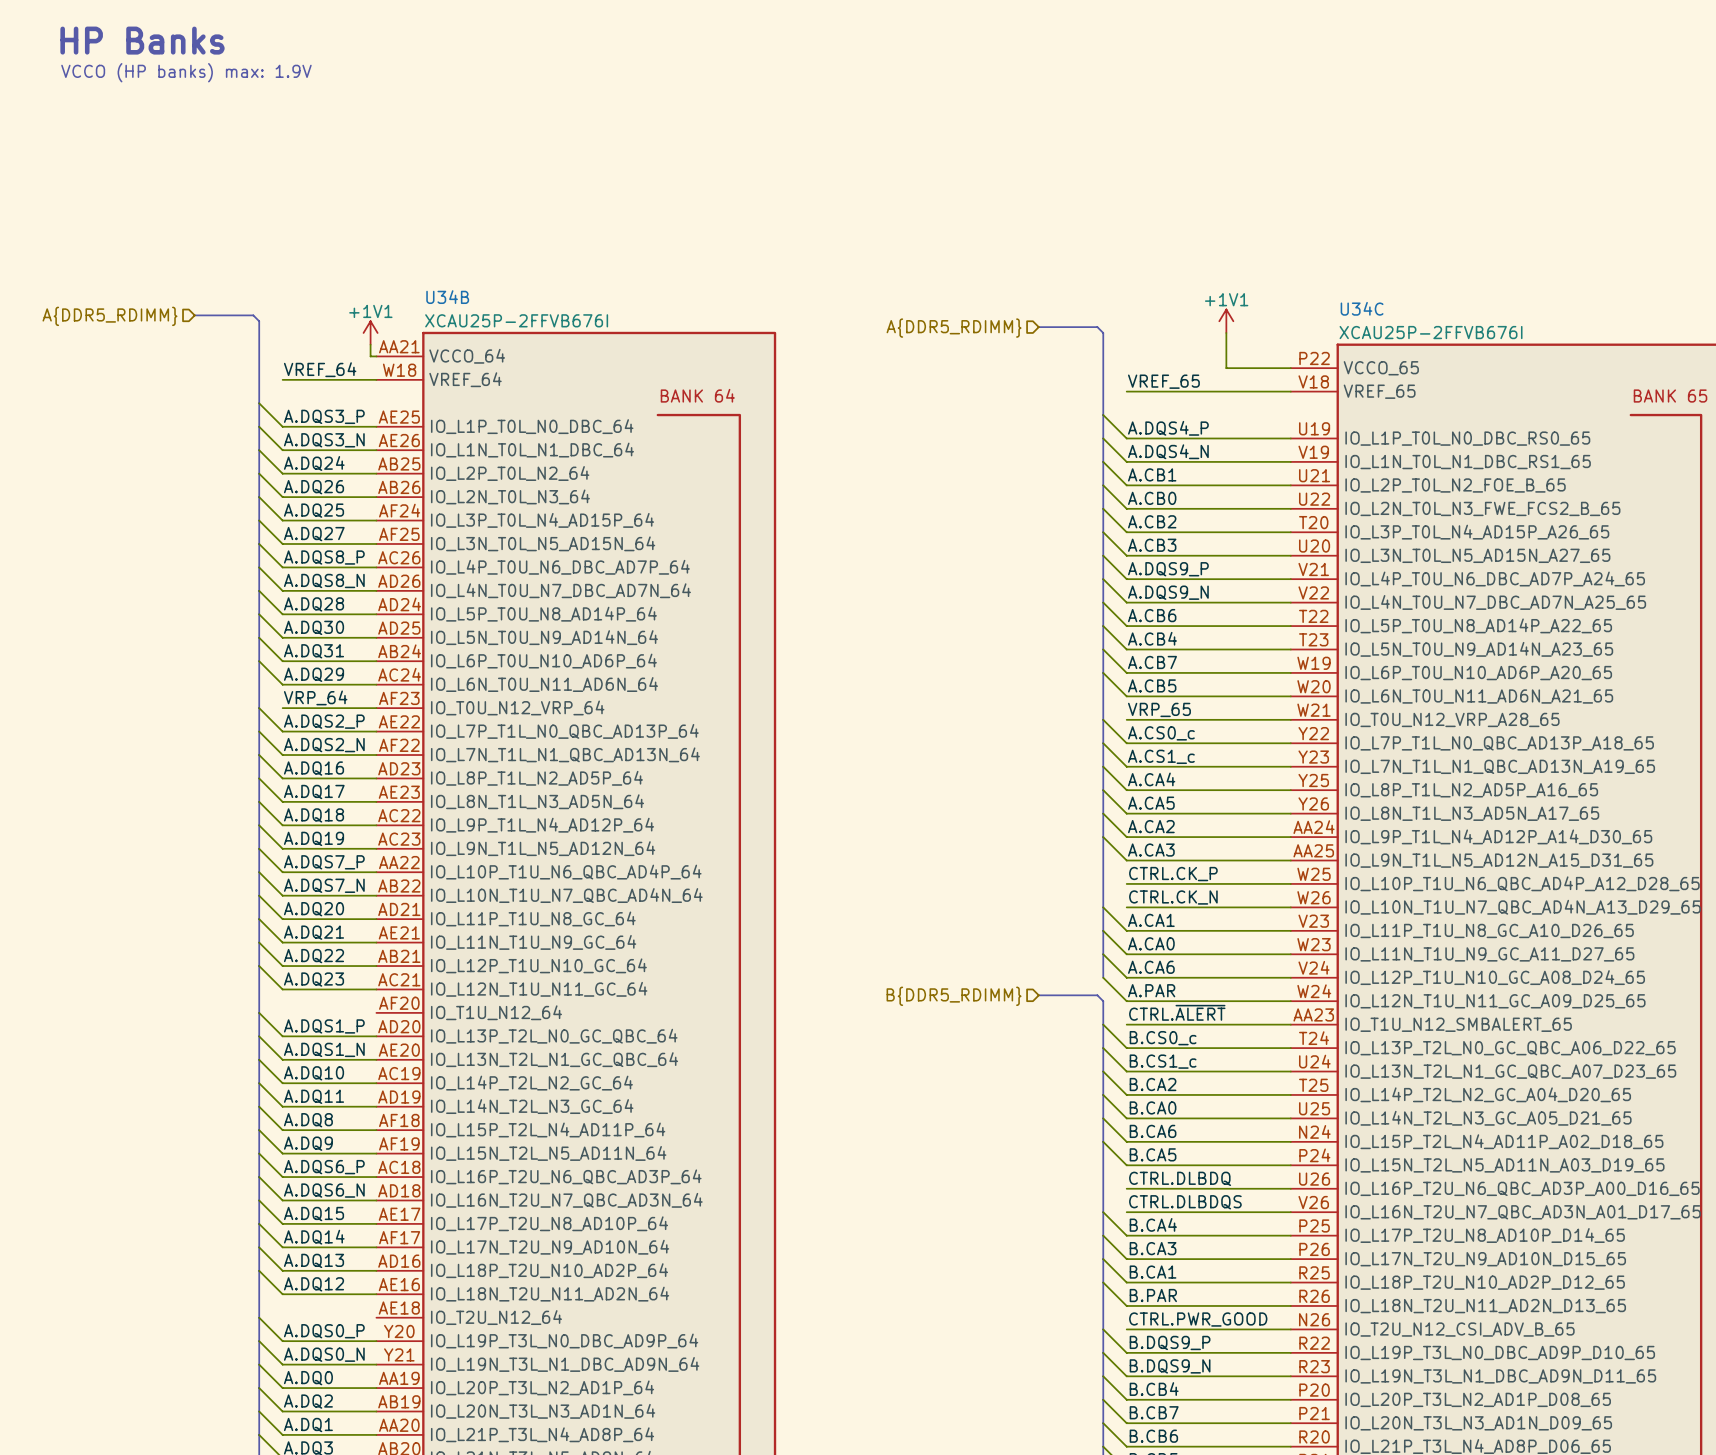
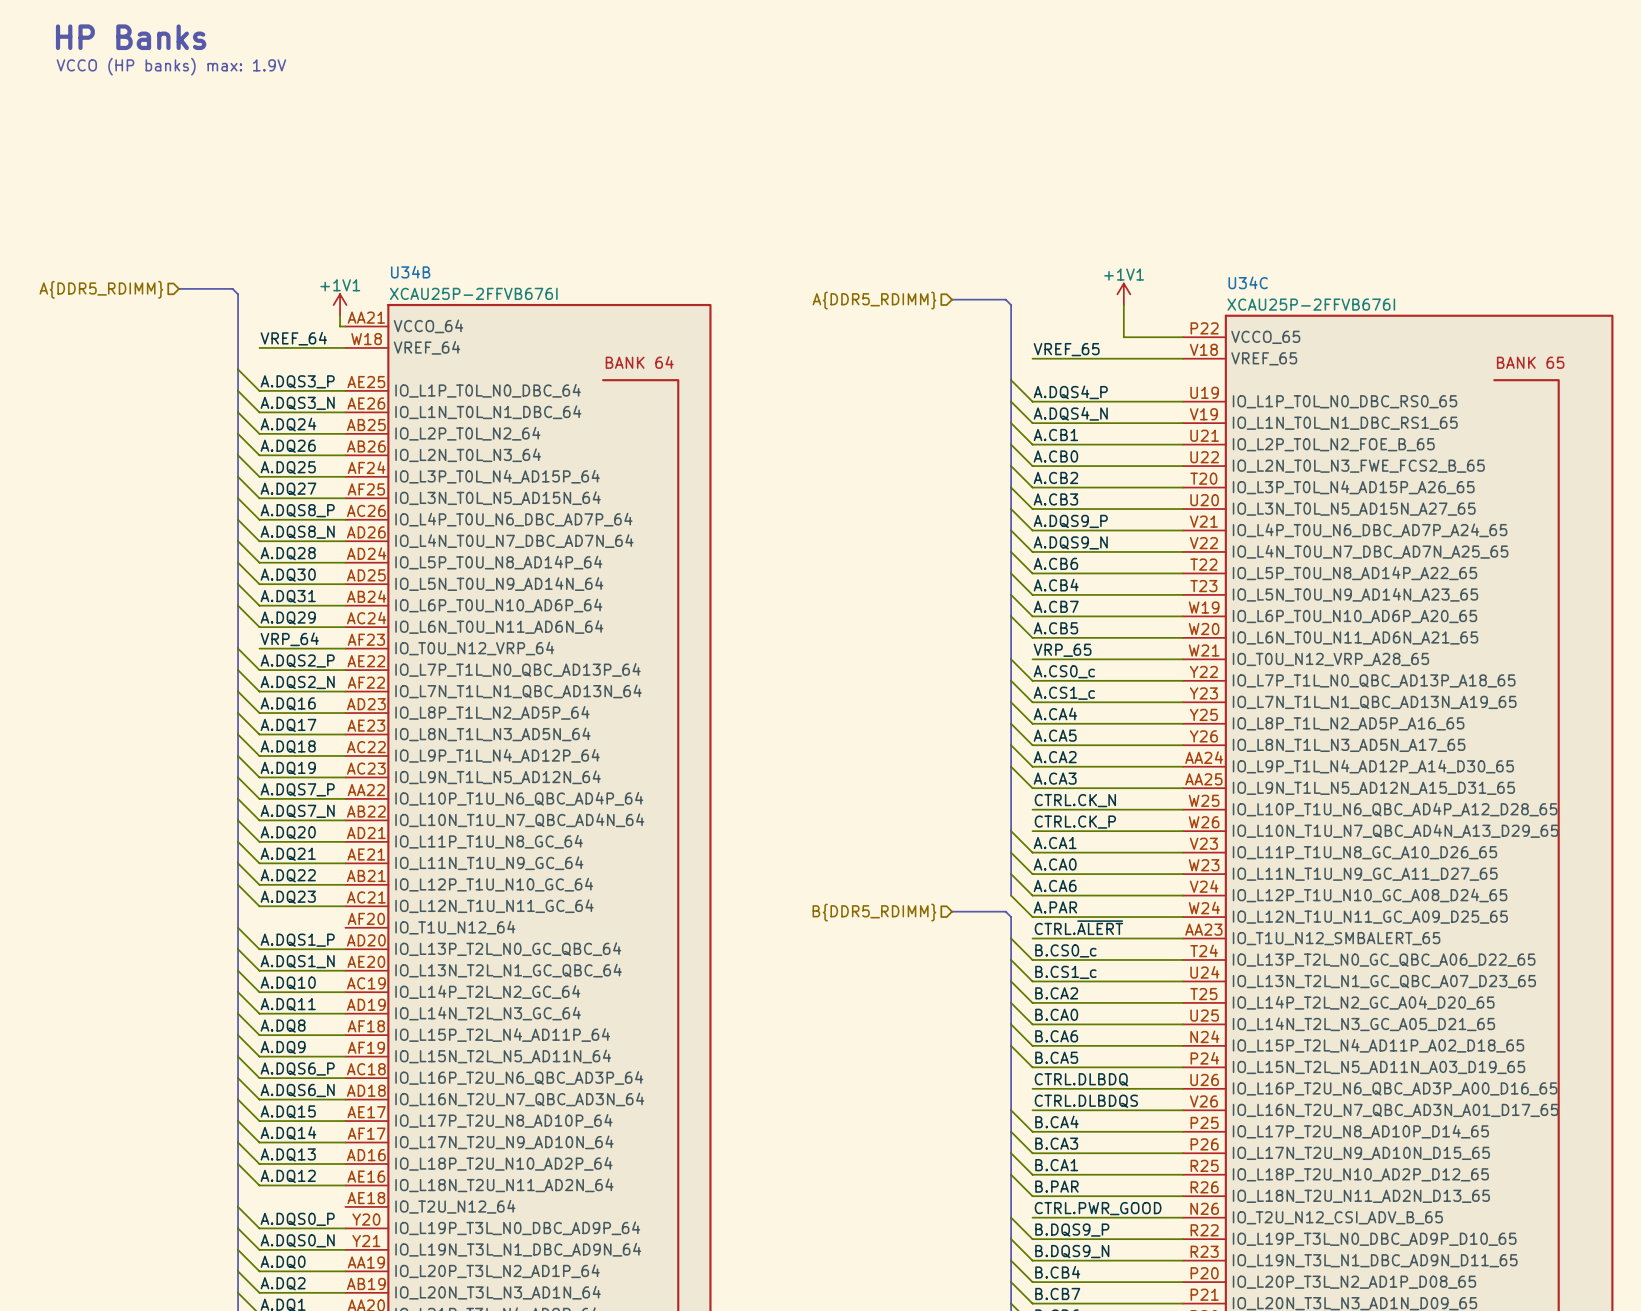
label: CTRL.CK_P (1173, 874) -> CTRL.CK_N (1075, 800)
label: CTRL.CK_N (1173, 897) -> CTRL.CK_P (1075, 822)

